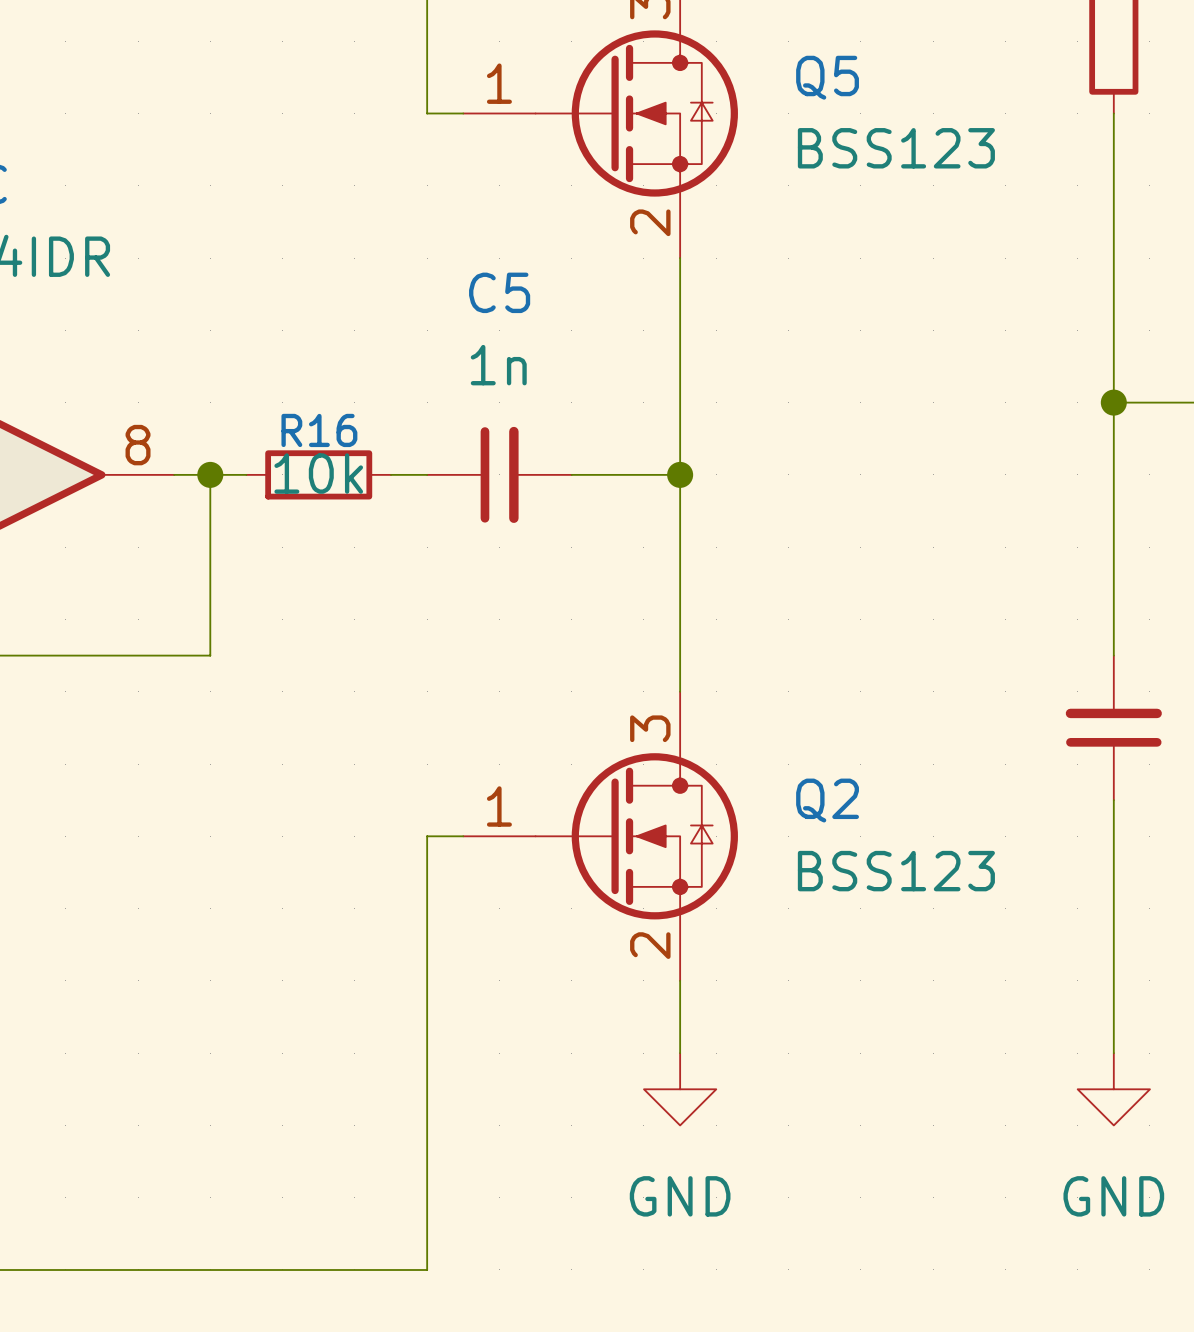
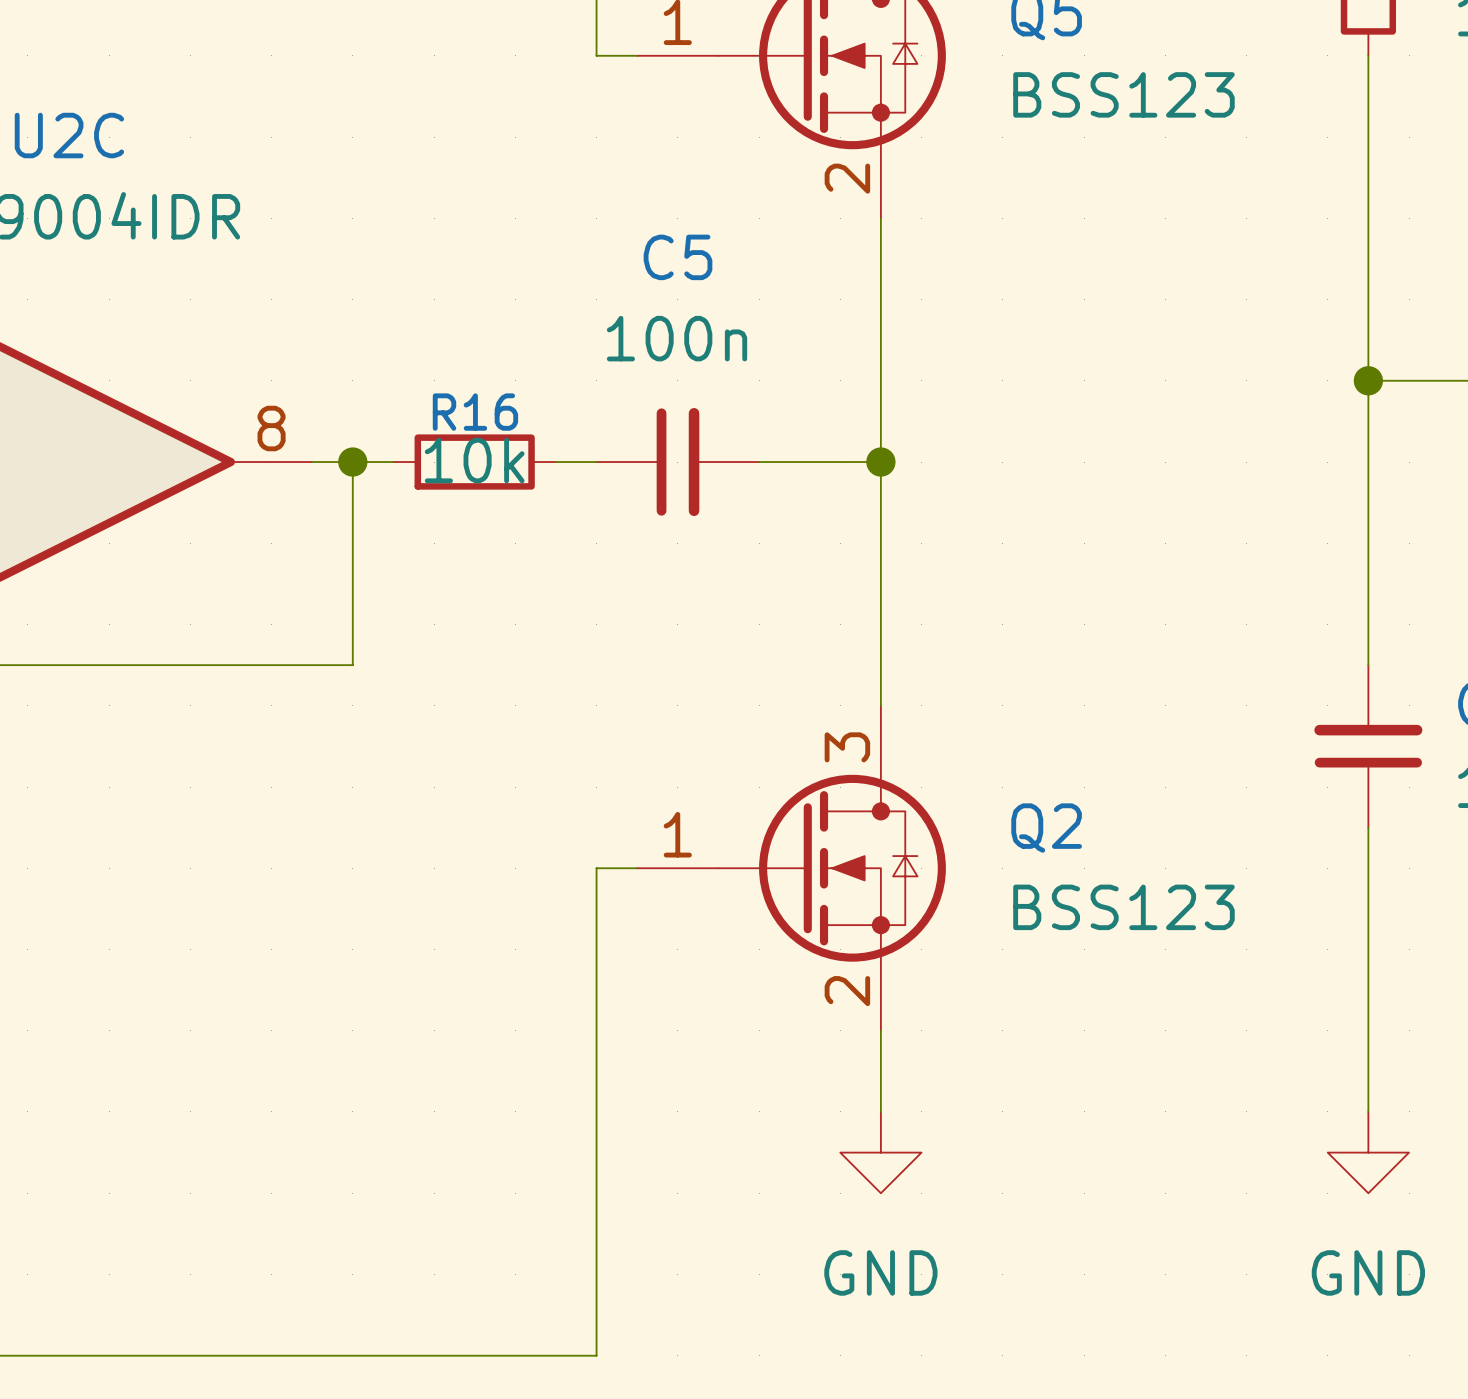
C5 value: 1n (498, 365) -> 100n (677, 338)

